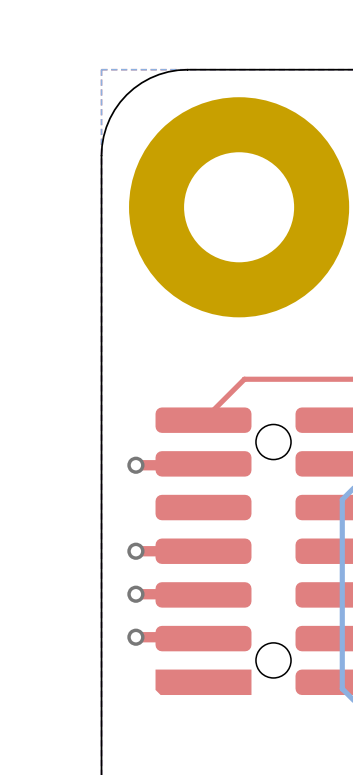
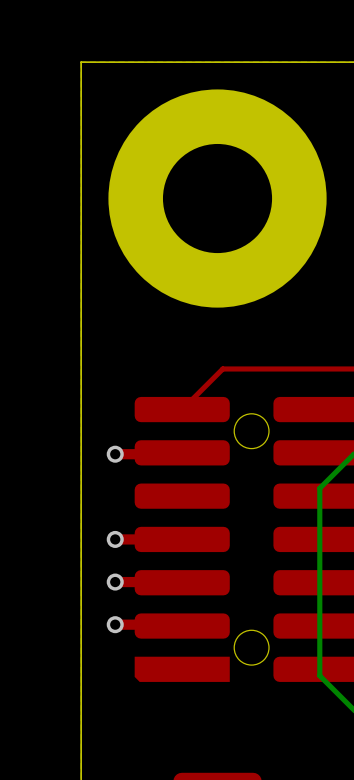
board edge: (187, 69) (168, 71) (150, 78) (126, 94) (110, 118) (103, 136) (101, 155) -> (166, 62) (81, 62) (81, 147)

